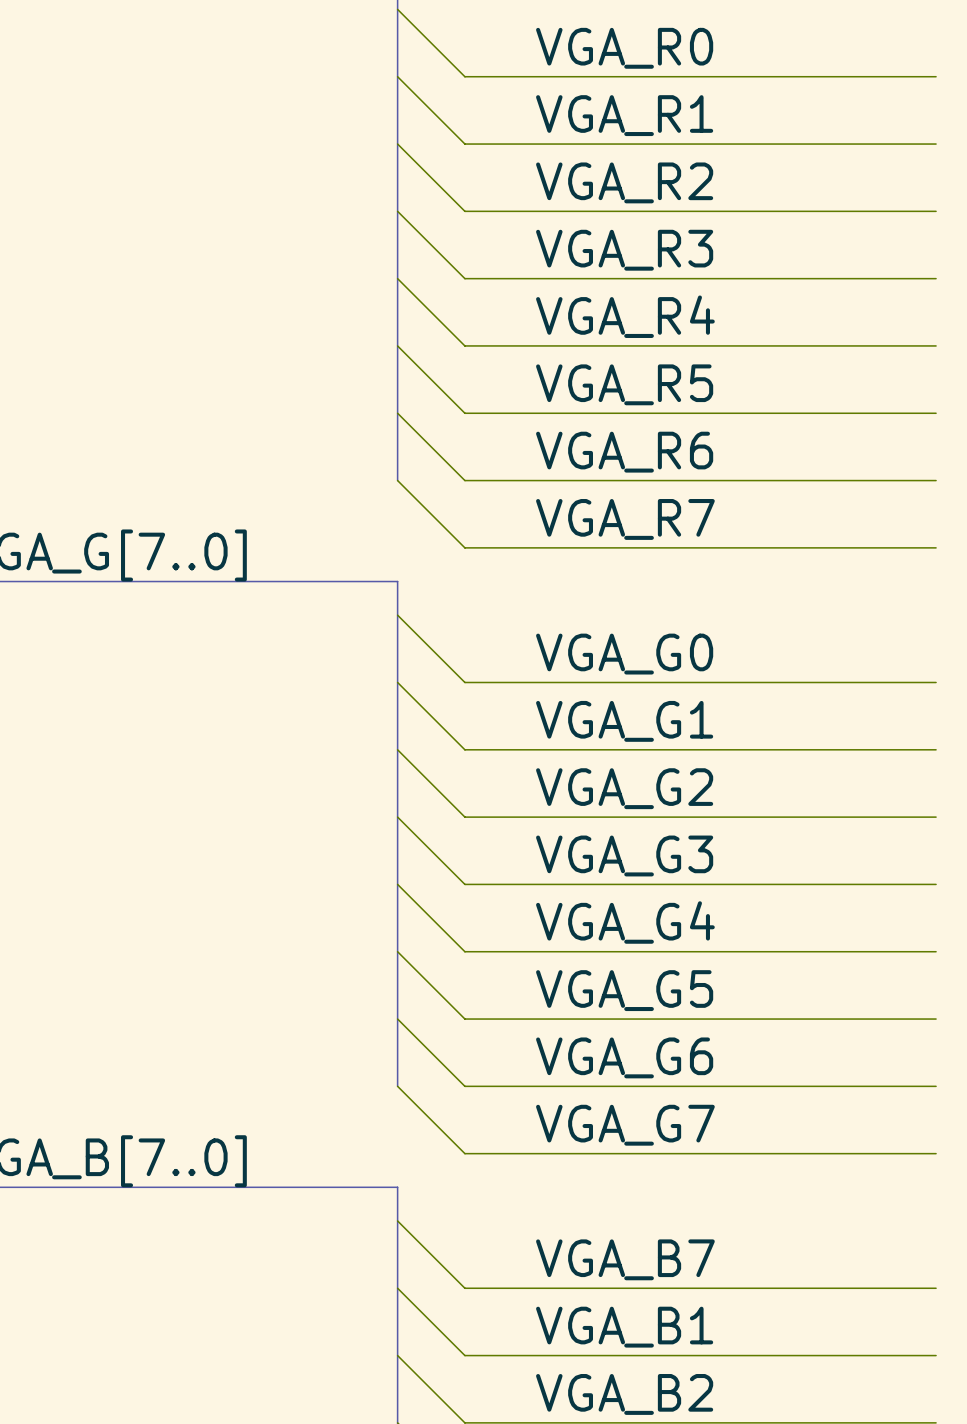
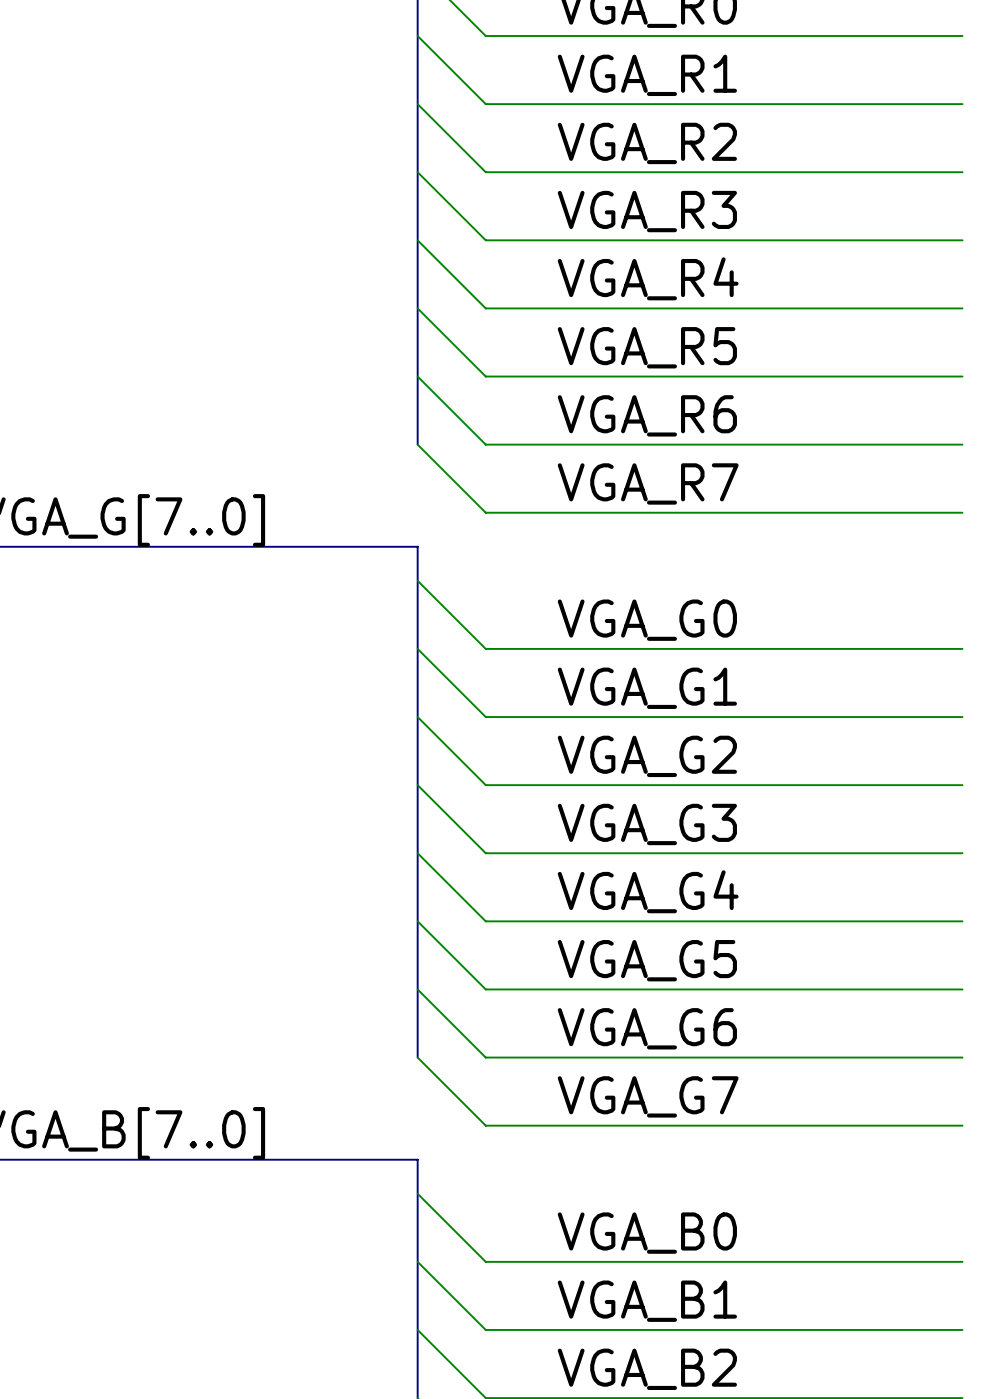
label: VGA_B7 (625, 1259) -> VGA_B0 (647, 1233)

